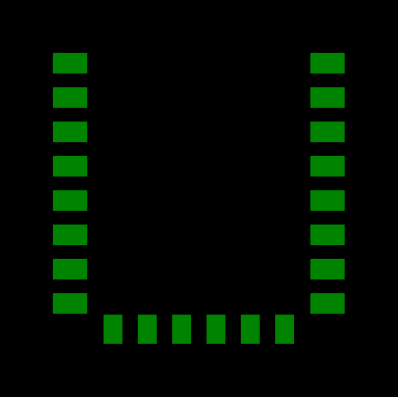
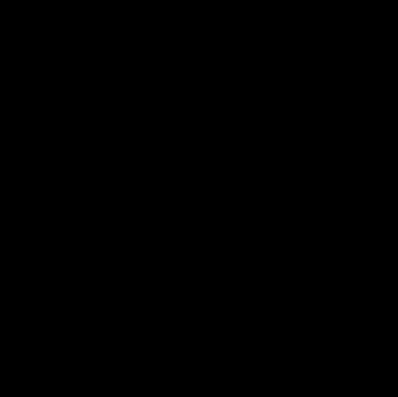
part: (198, 198) -> none

